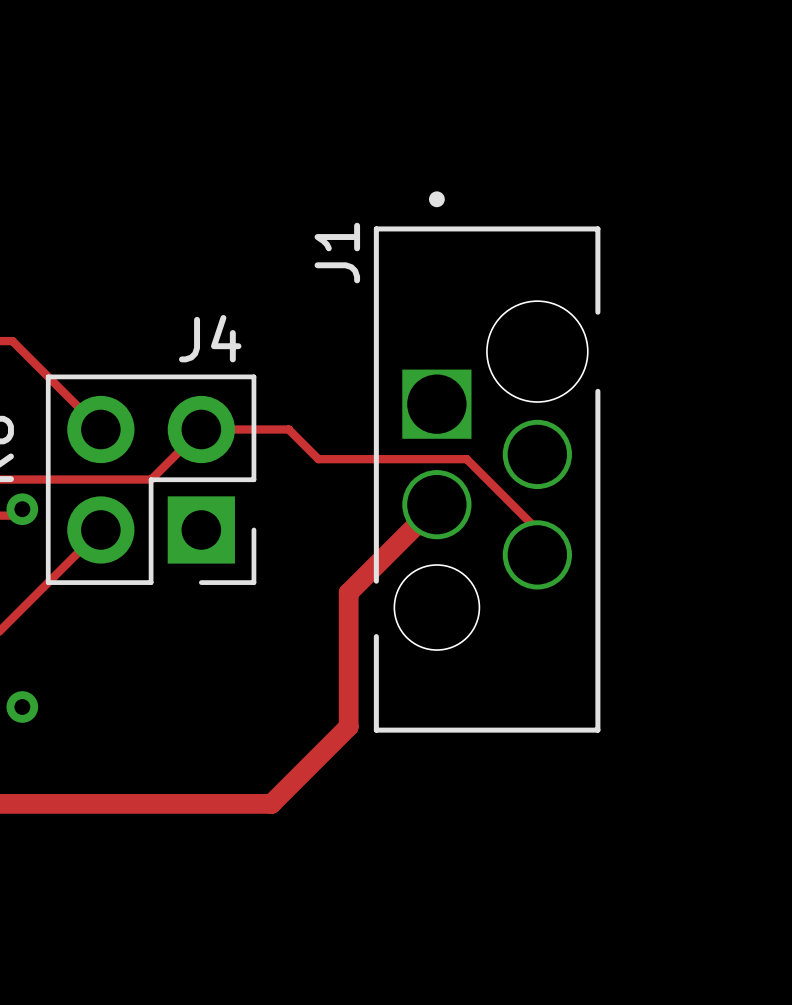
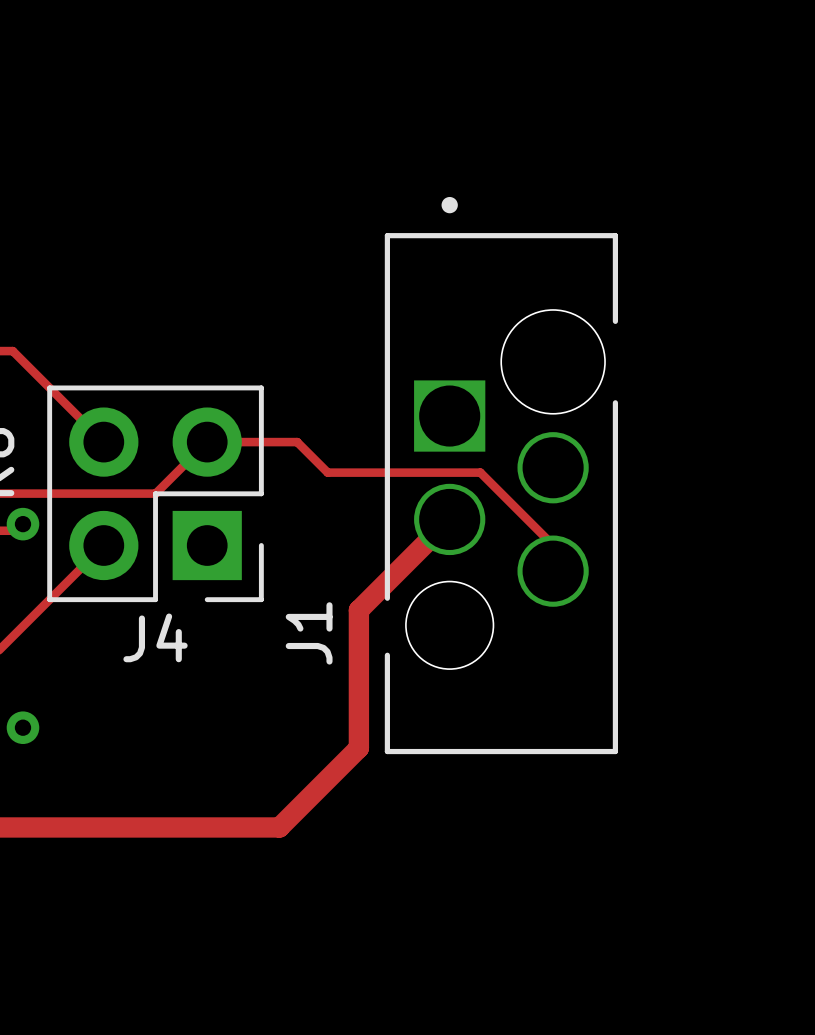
J1 name position: J1 (337, 253) -> J1 (309, 633)
J4 name position: J4 (210, 338) -> J4 (155, 637)

